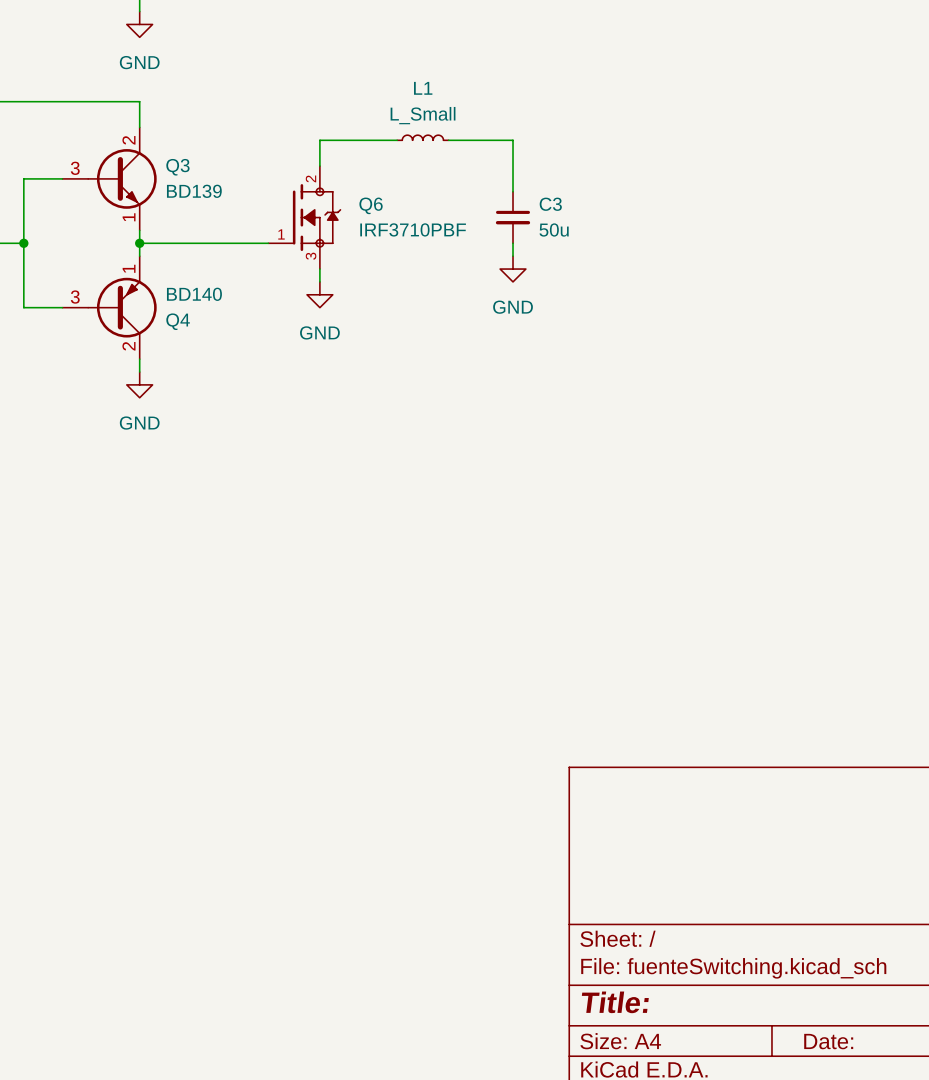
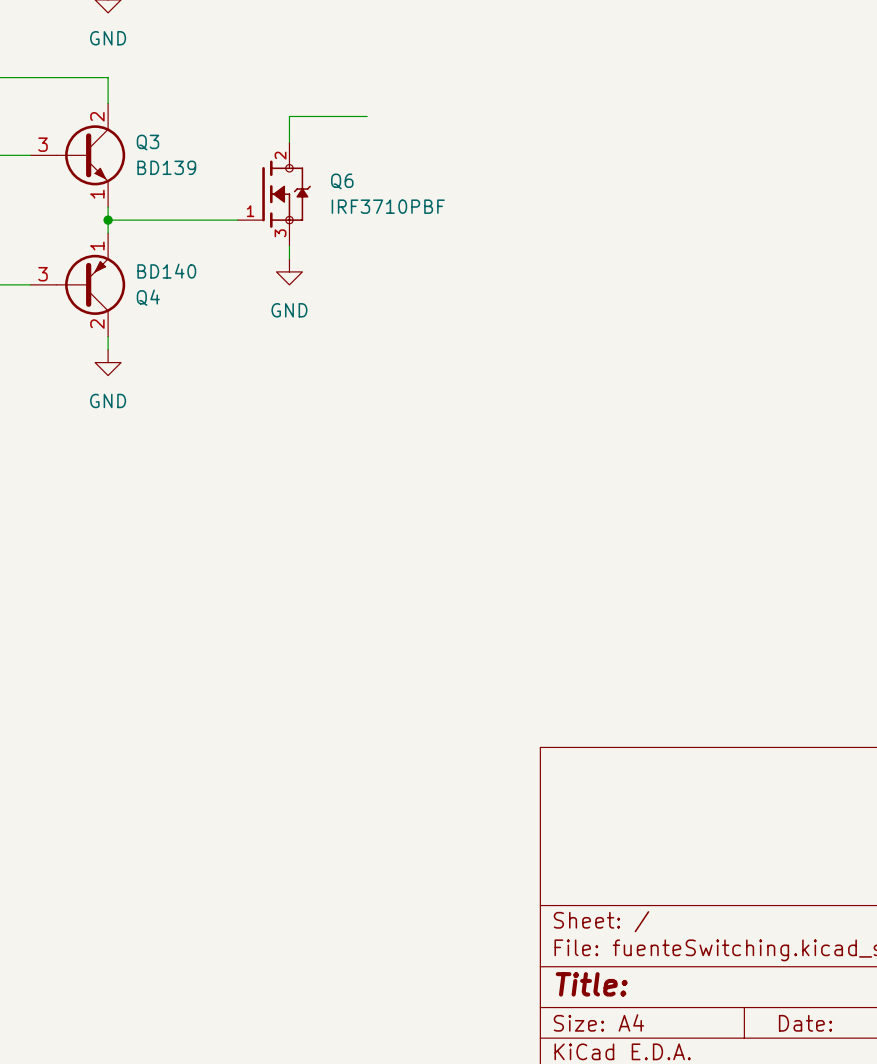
L1: L_Small (422, 137) -> none
wire: (448, 140) (513, 140) (513, 191) -> none
C3: 50u (513, 217) -> none
wire: (513, 243) (513, 256) -> none
power symbol: GND (513, 269) -> none

